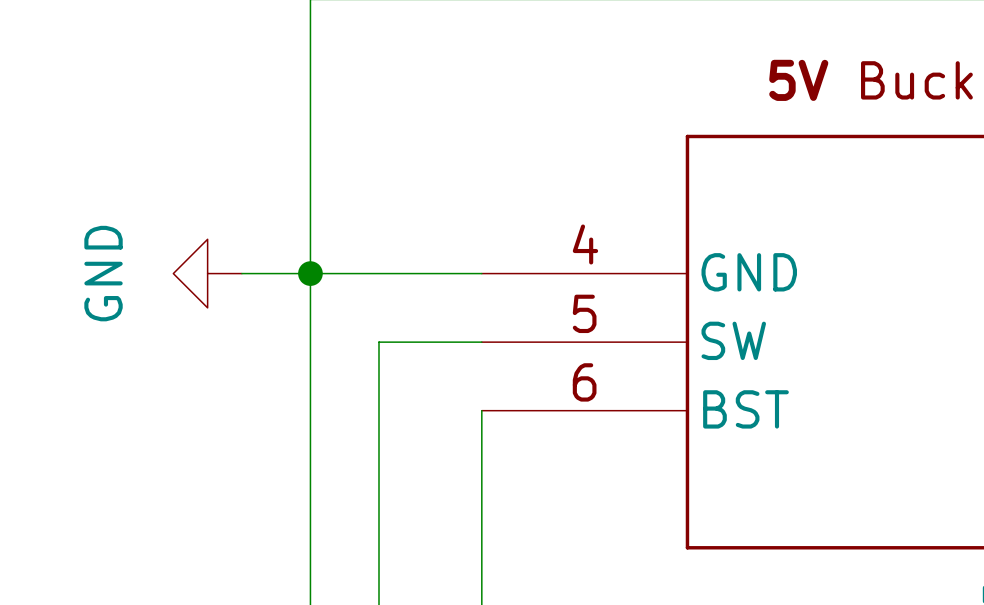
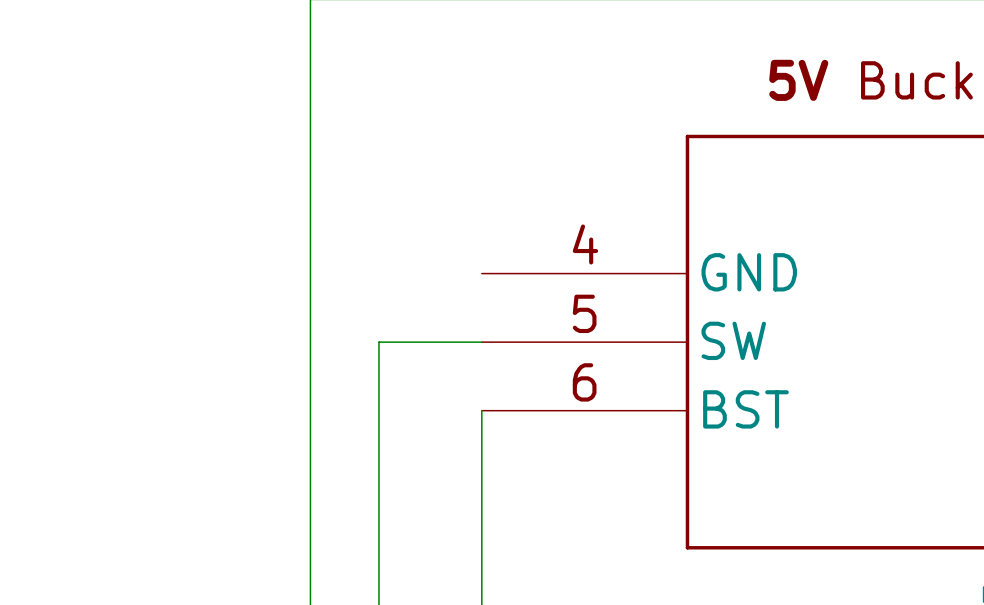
power symbol: GND (207, 273) -> none
wire: (241, 273) (481, 273) -> none
junction: (310, 273) -> none

